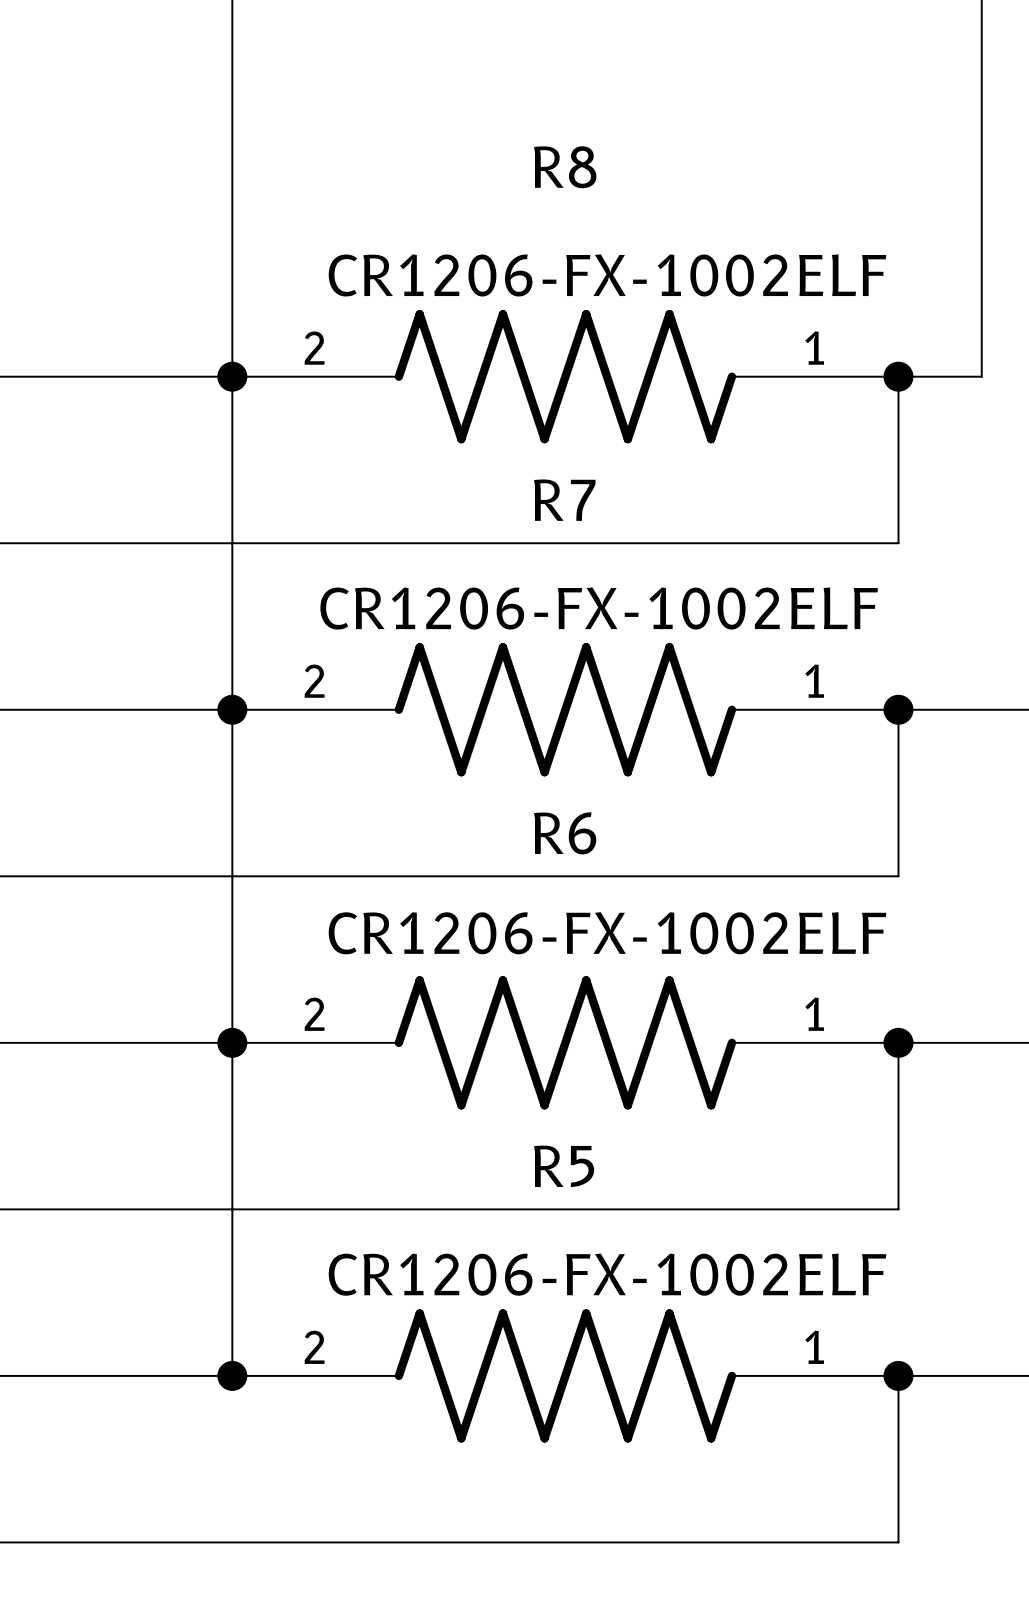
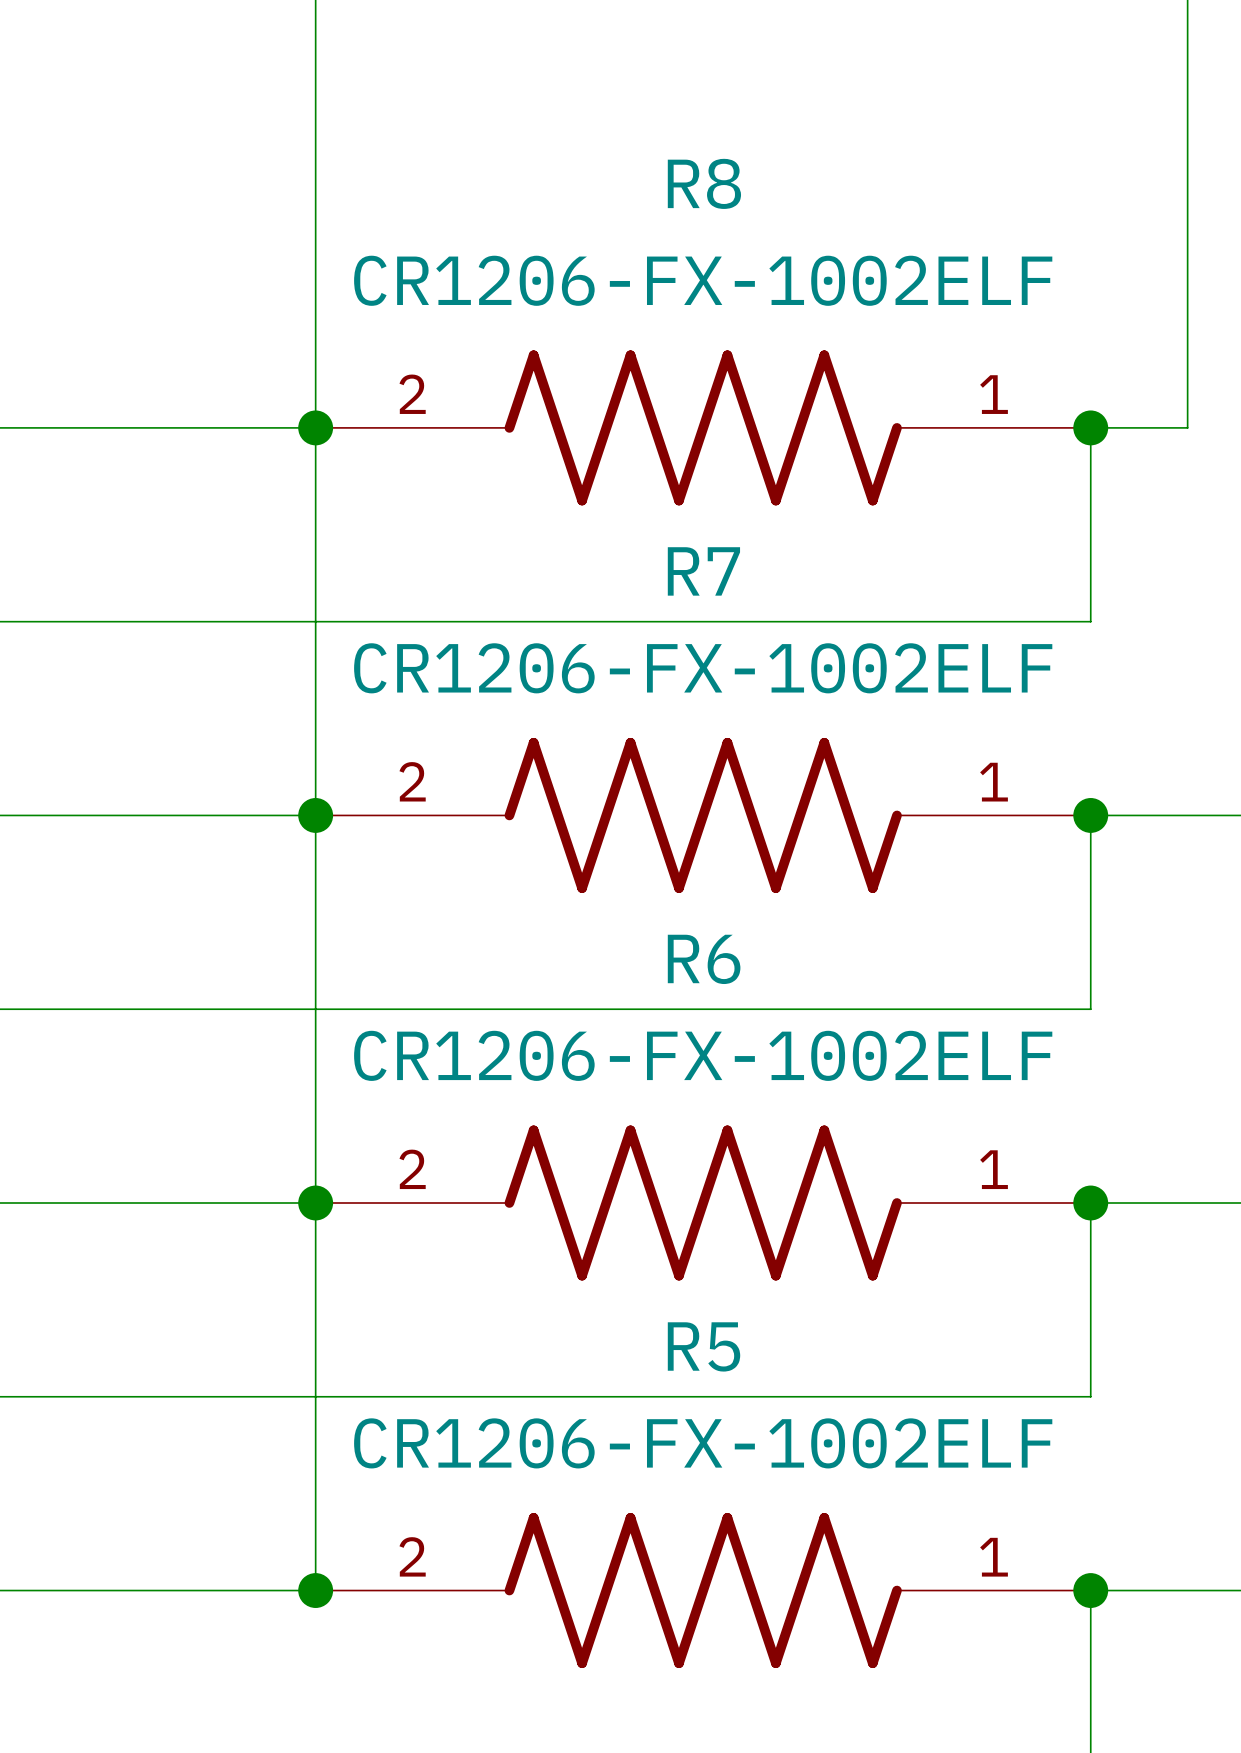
R8 value position: CR1206-FX-1002ELF (607, 275) -> CR1206-FX-1002ELF (703, 280)
R7 value position: CR1206-FX-1002ELF (599, 608) -> CR1206-FX-1002ELF (703, 668)
R6 value position: CR1206-FX-1002ELF (607, 933) -> CR1206-FX-1002ELF (703, 1055)
R5 value position: CR1206-FX-1002ELF (607, 1274) -> CR1206-FX-1002ELF (703, 1443)

